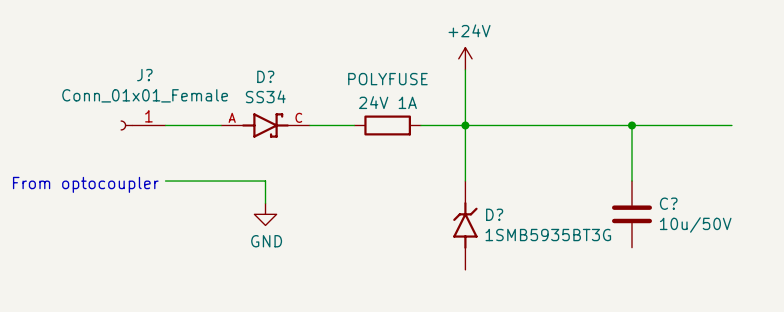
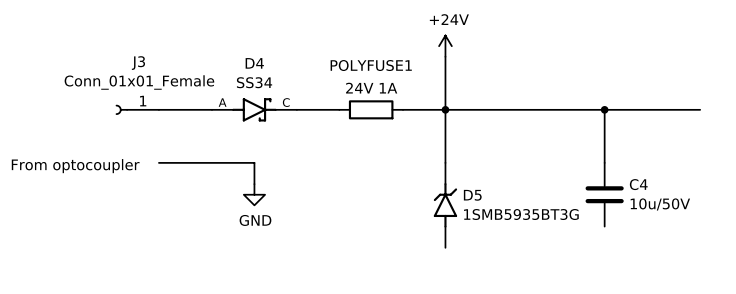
J? name: J? (144, 75) -> J3 (138, 63)
D? name: D? (265, 76) -> D4 (254, 63)
POLYFUSE name: POLYFUSE (387, 79) -> POLYFUSE1 (371, 65)
C? name: C? (668, 203) -> C4 (638, 184)
D? name: D? (494, 214) -> D5 (472, 195)

